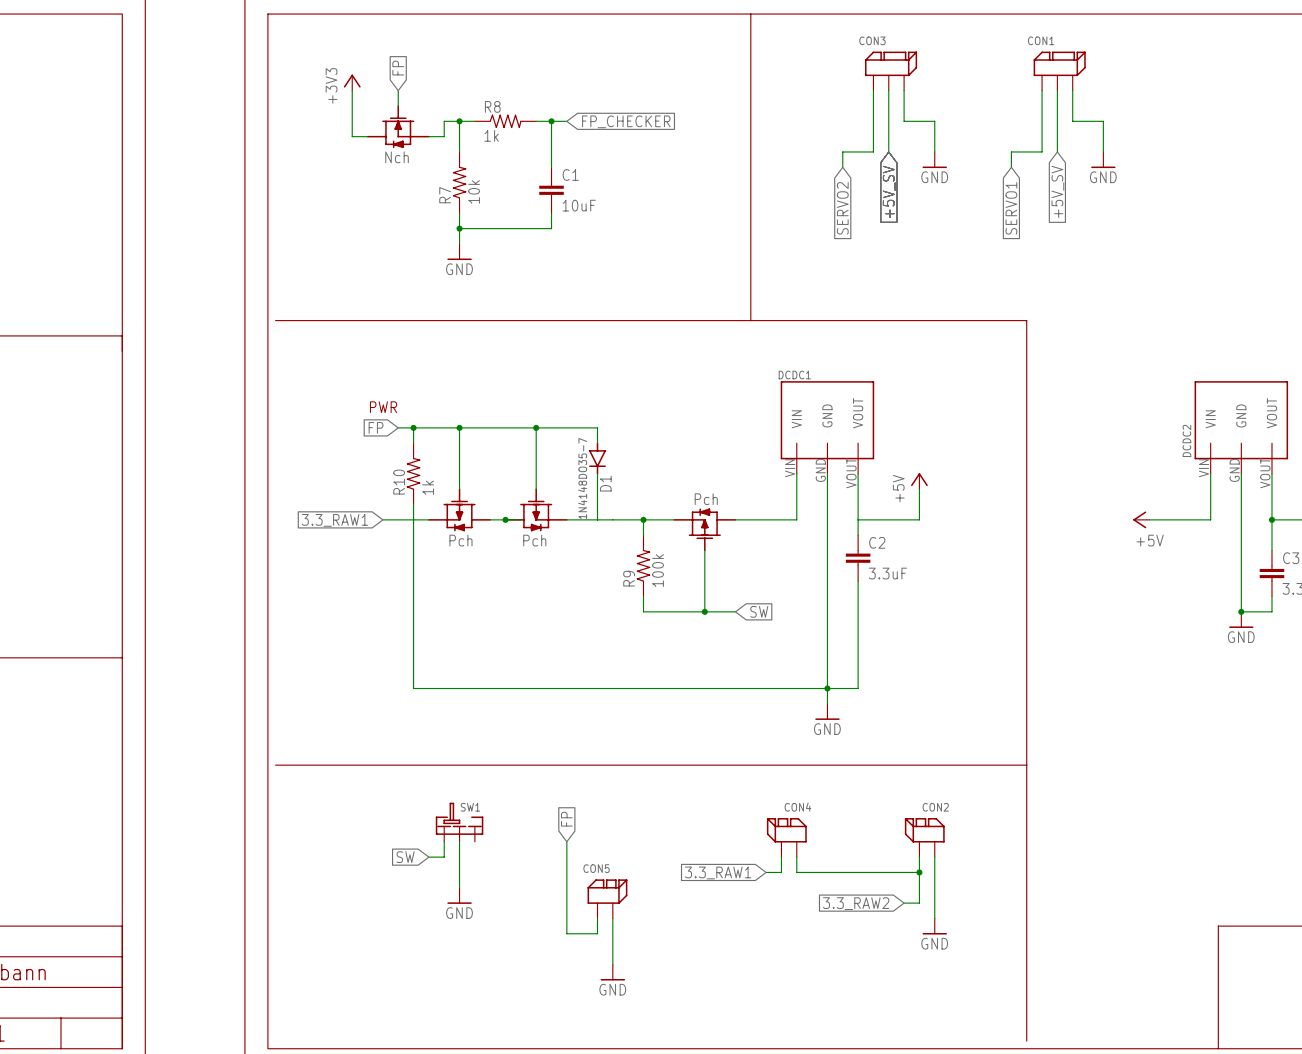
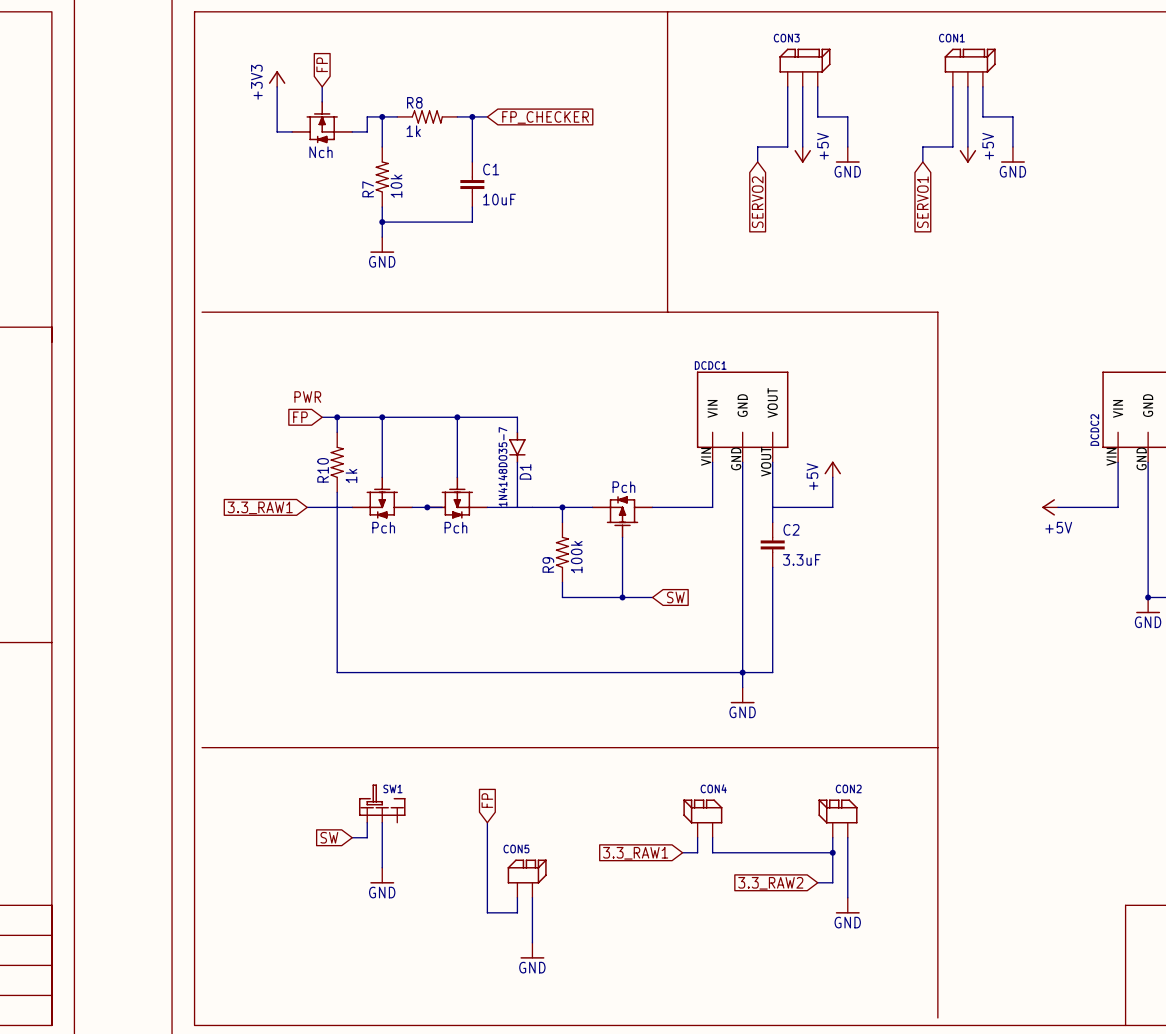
power symbol: none -> +5V (802, 154)
power symbol: none -> +5V (967, 154)
global label: +5V_SV (889, 191) -> none
global label: +5V_SV (1057, 191) -> none

